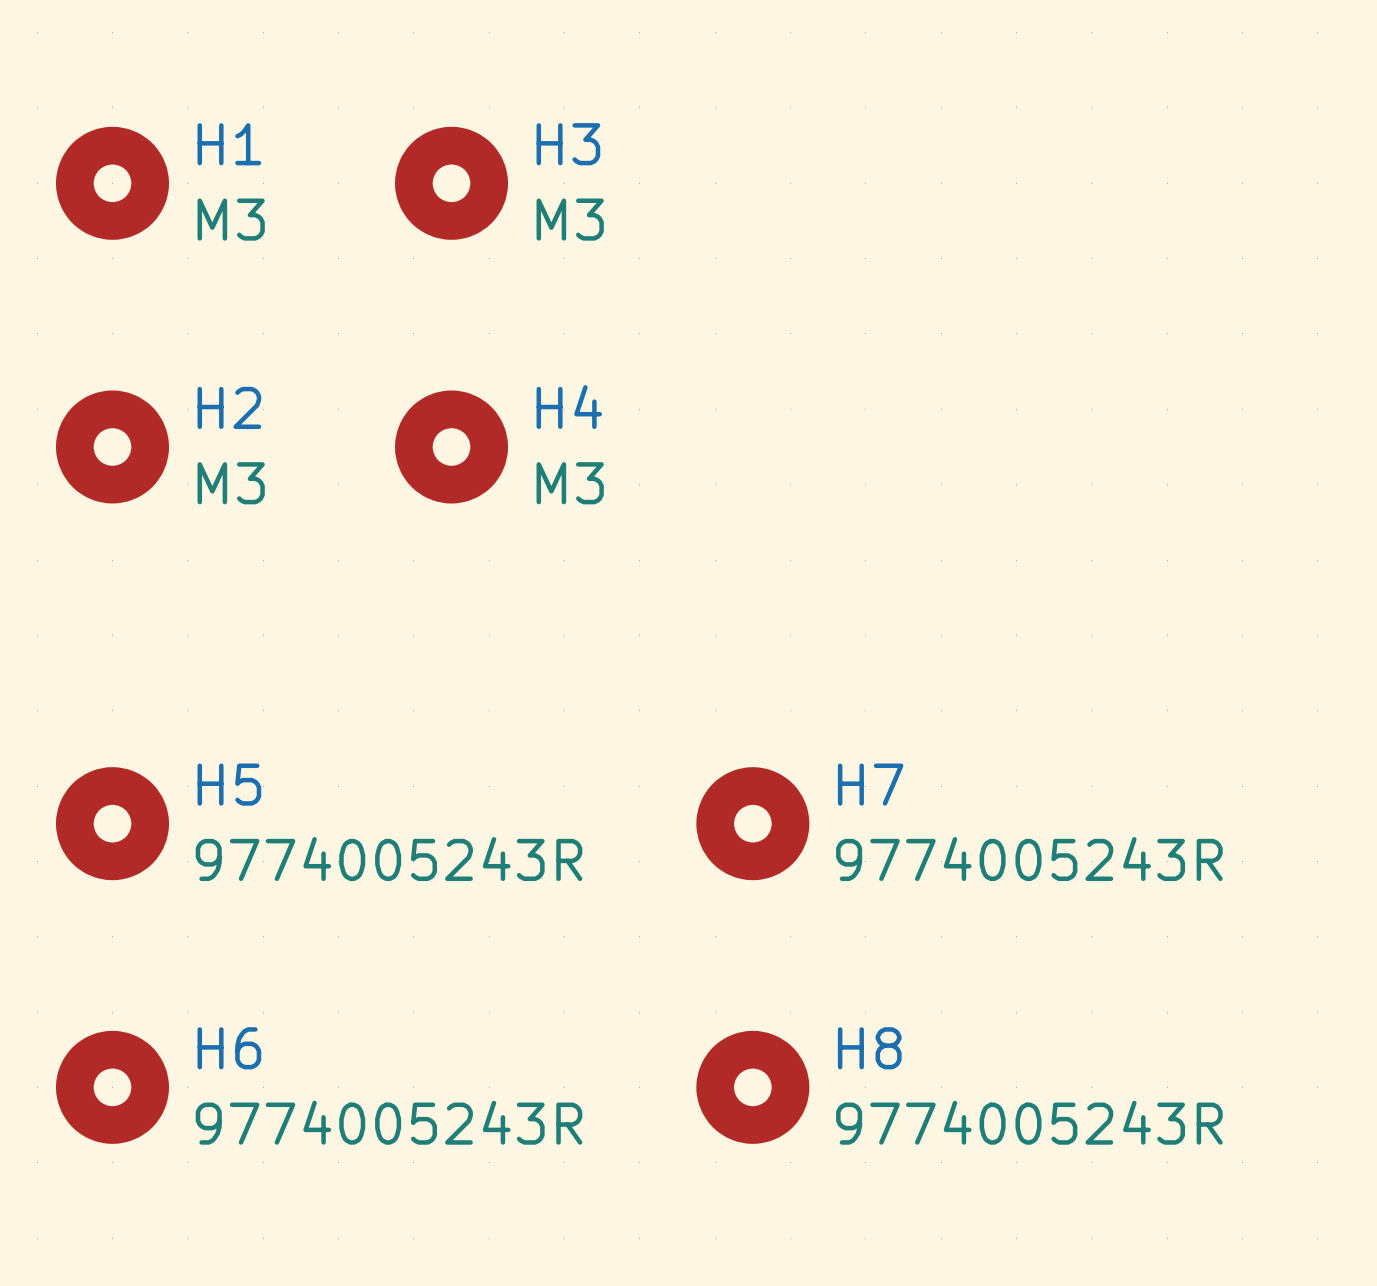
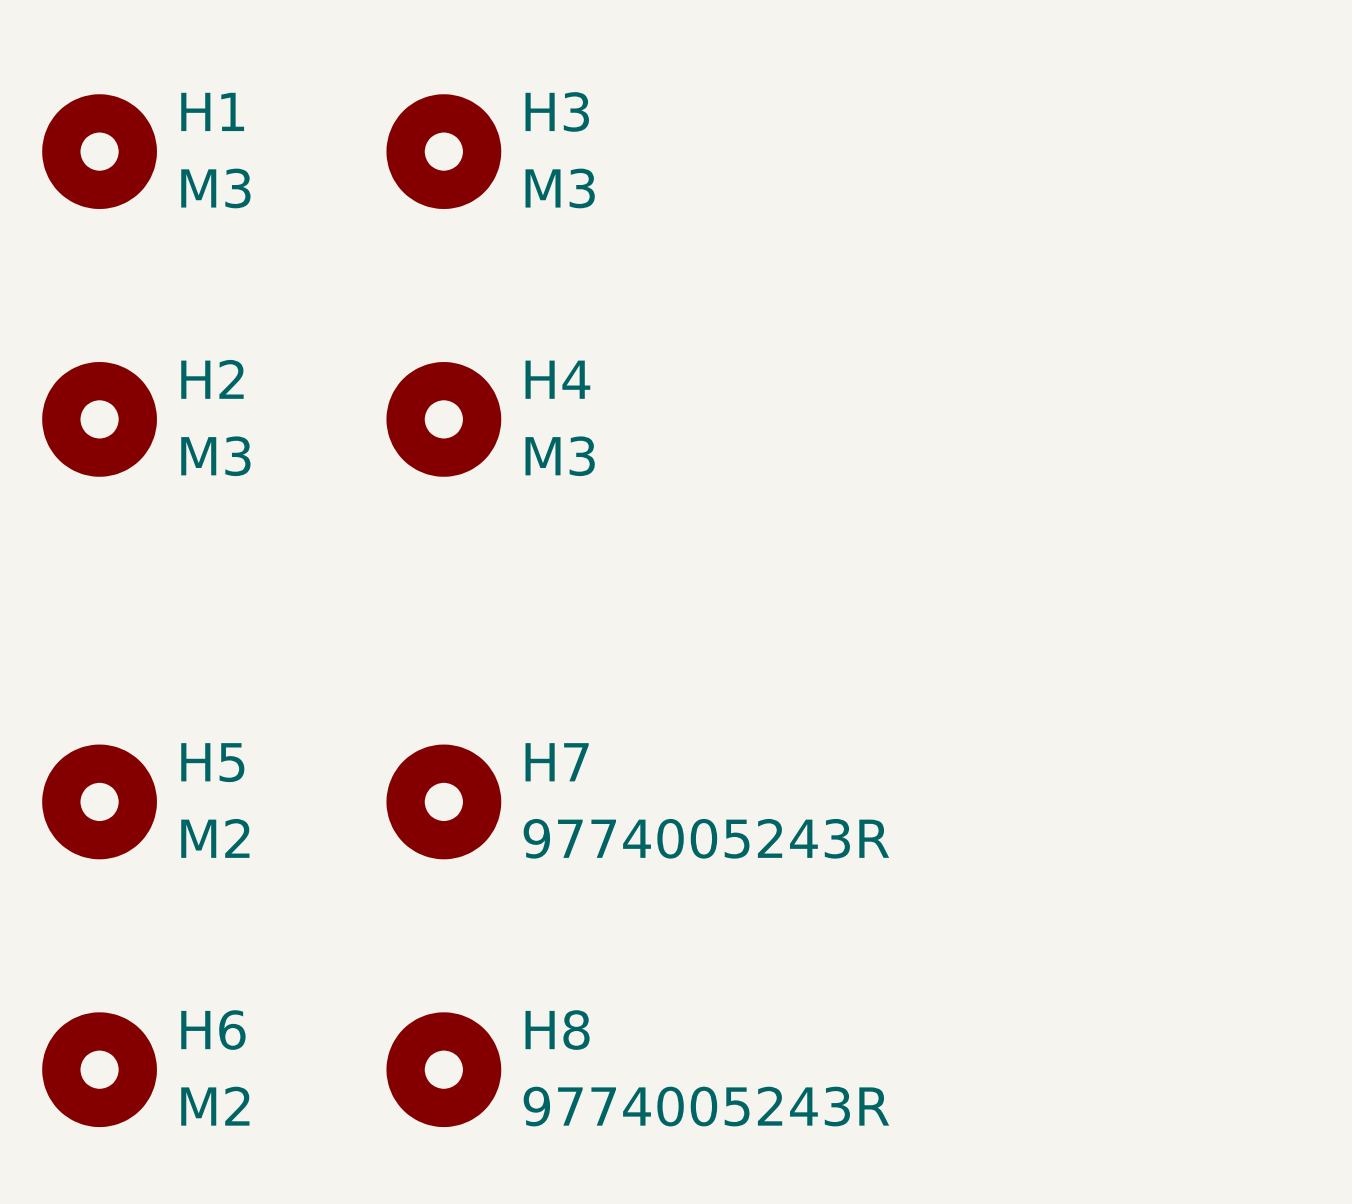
H7 position: (752, 823) -> (443, 801)
H5 value: 9774005243R (389, 859) -> M2 (215, 838)
H8 position: (752, 1087) -> (443, 1069)
H6 value: 9774005243R (389, 1122) -> M2 (215, 1106)

